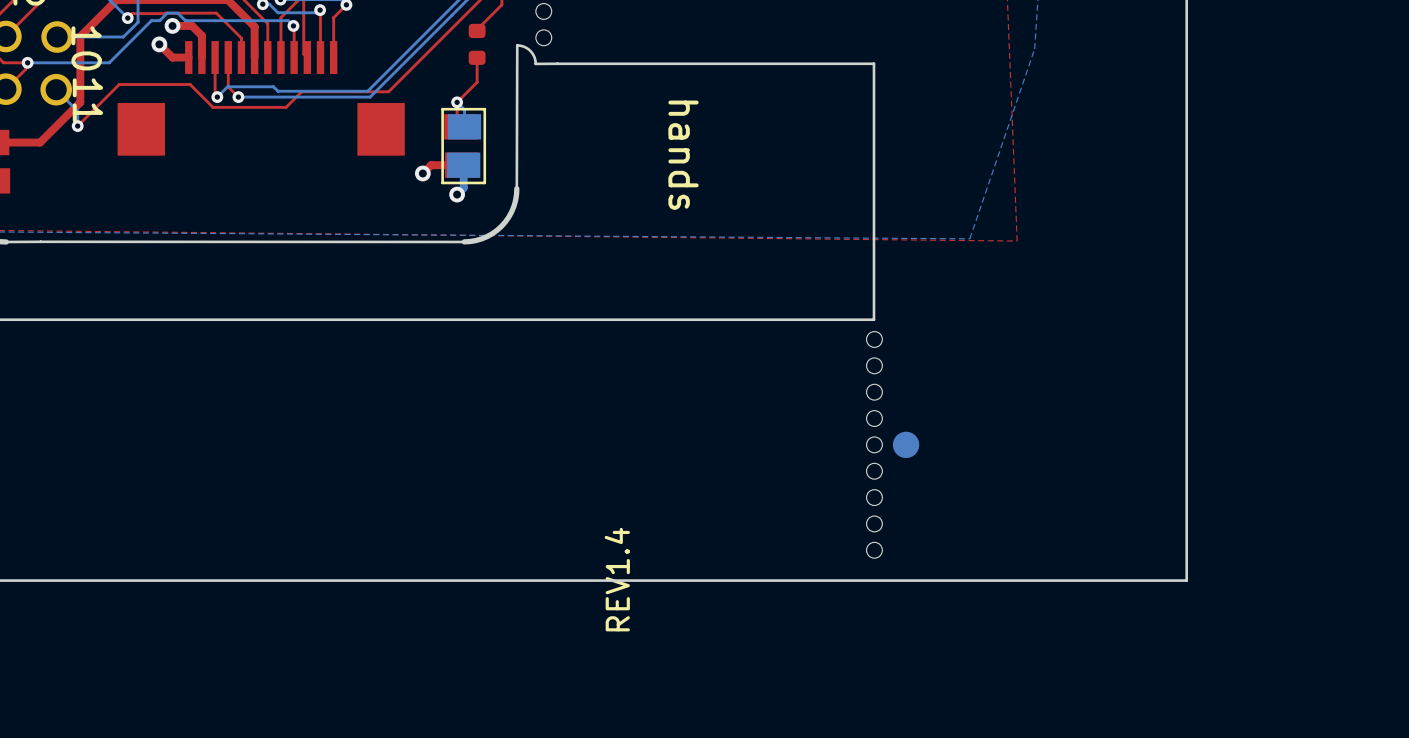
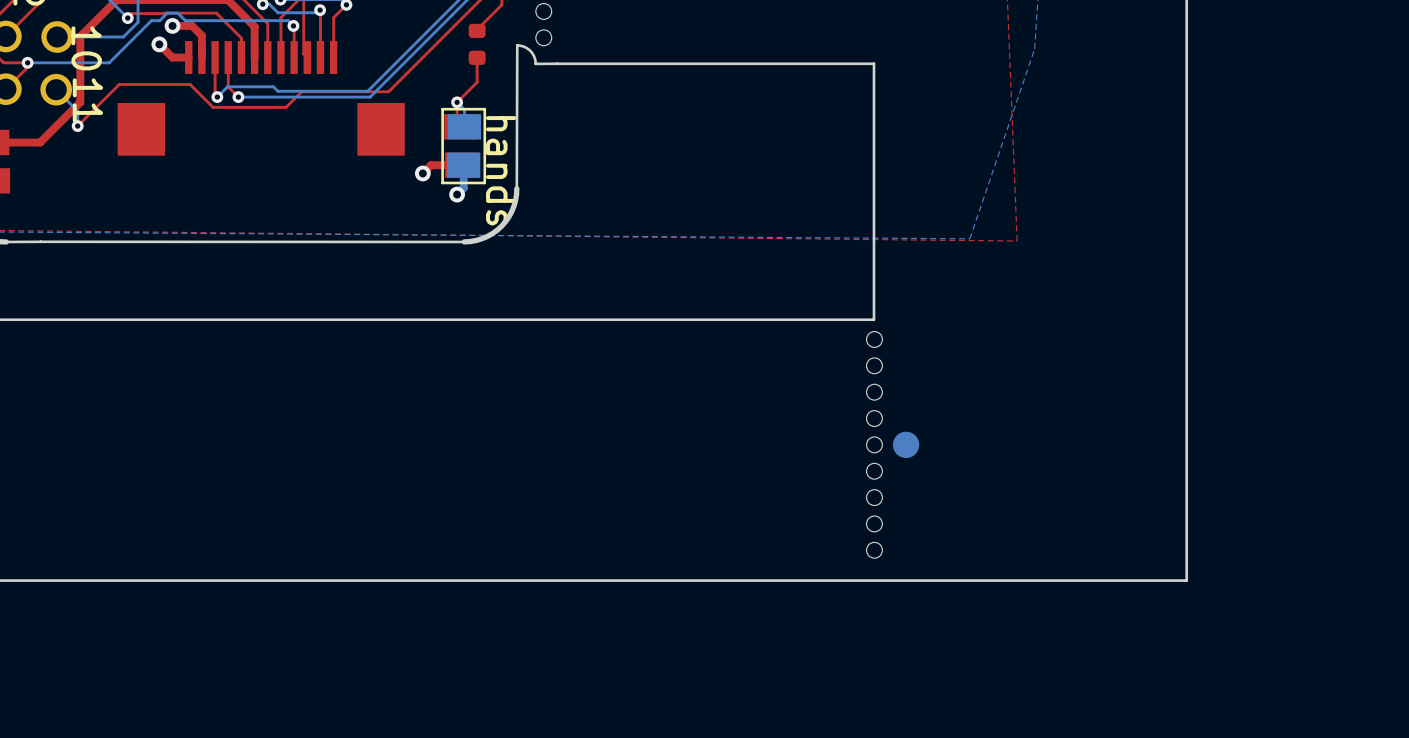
text position: hands (683, 155) -> hands (501, 170)
text: REV1.4 (617, 579) -> none

